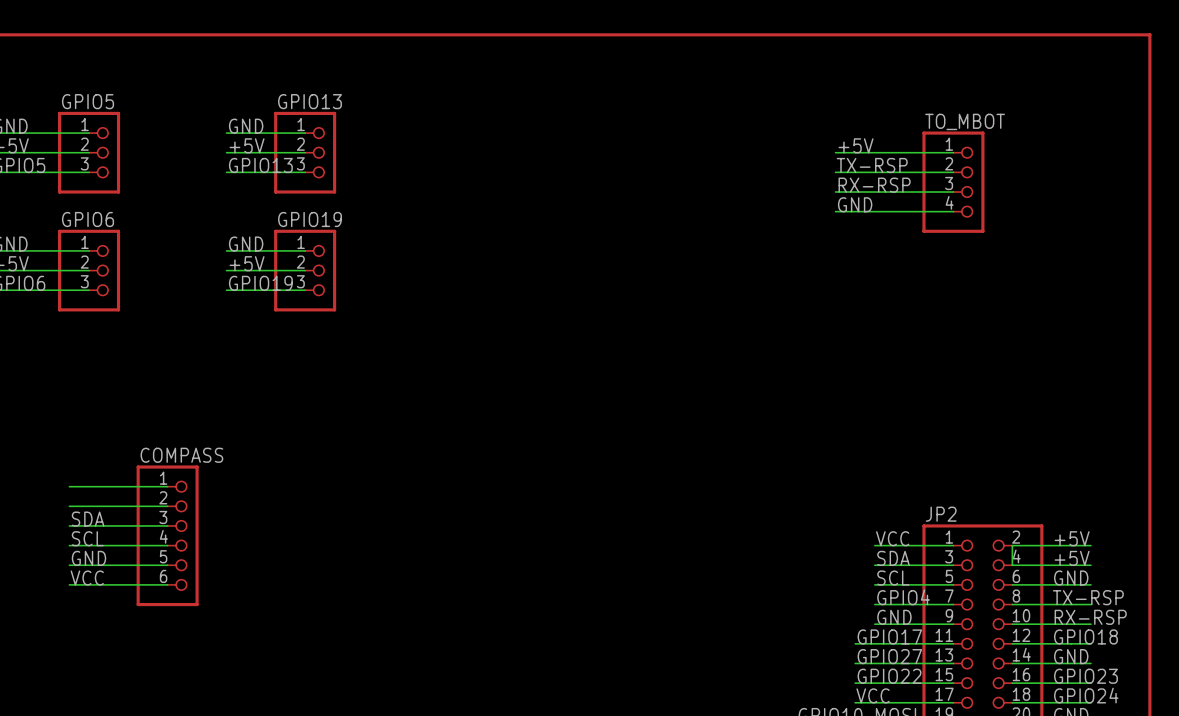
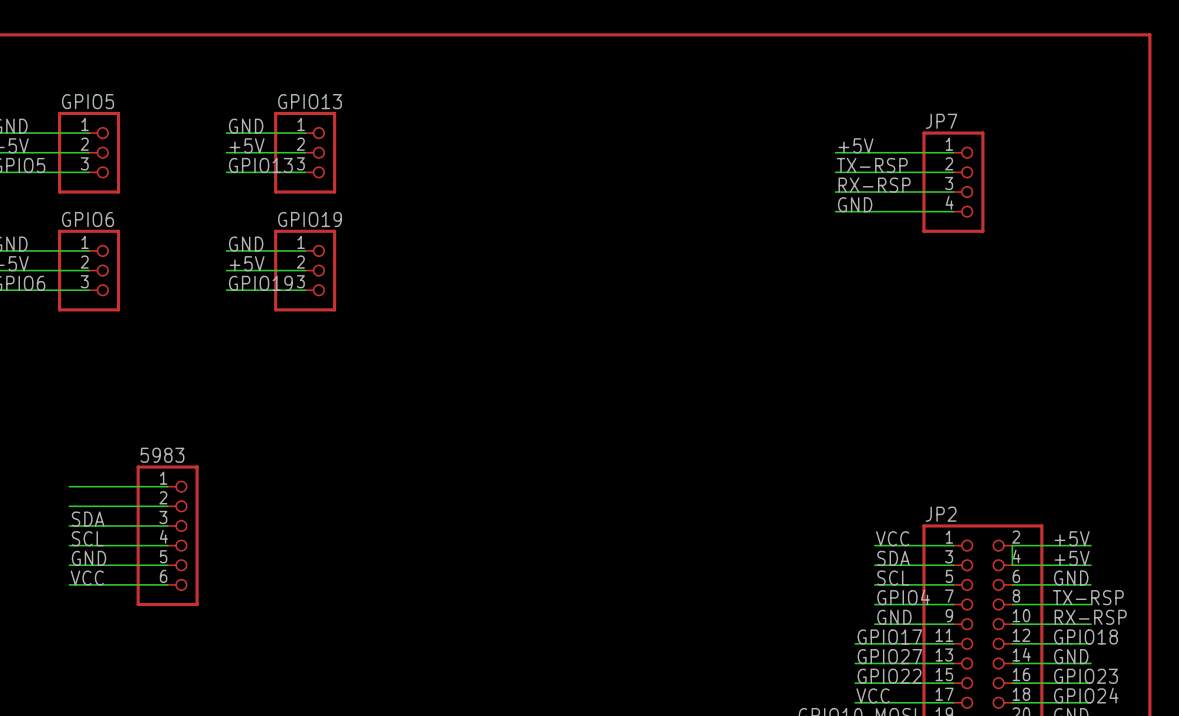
TO_MBOT name: TO_MBOT (965, 121) -> JP7 (941, 121)
COMPASS name: COMPASS (181, 455) -> 5983 (162, 455)

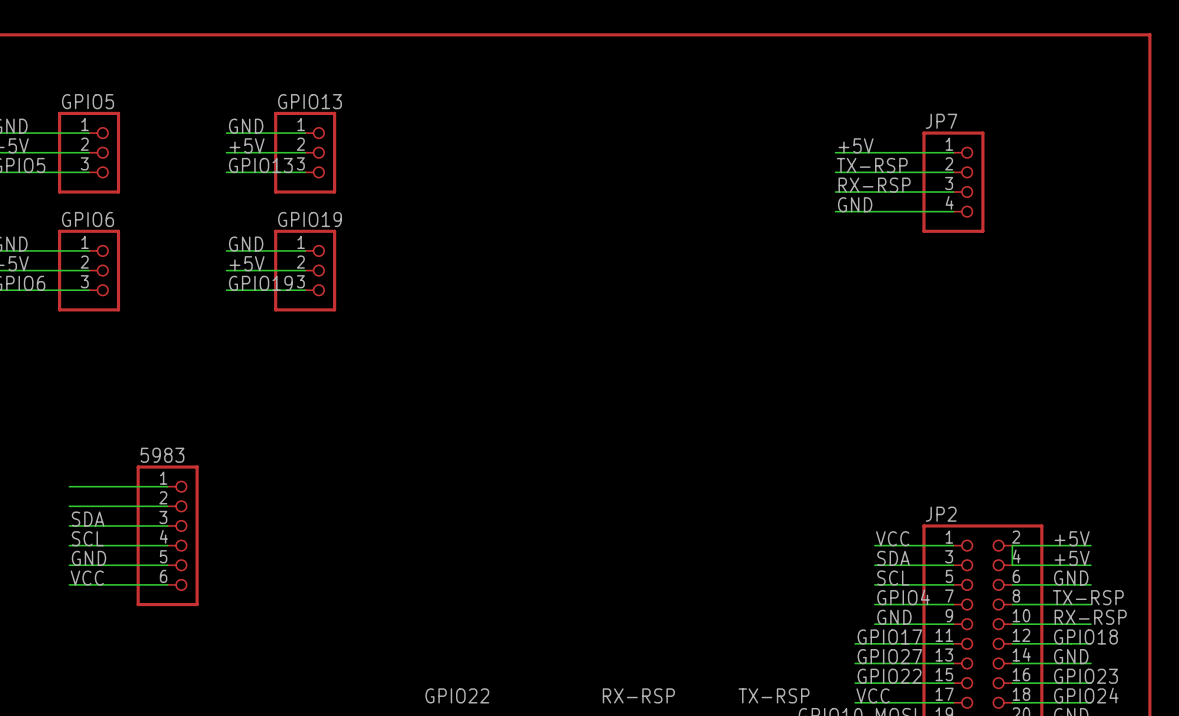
label: none -> GPIO22 (457, 695)
label: none -> RX-RSP (638, 695)
label: none -> TX-RSP (774, 695)

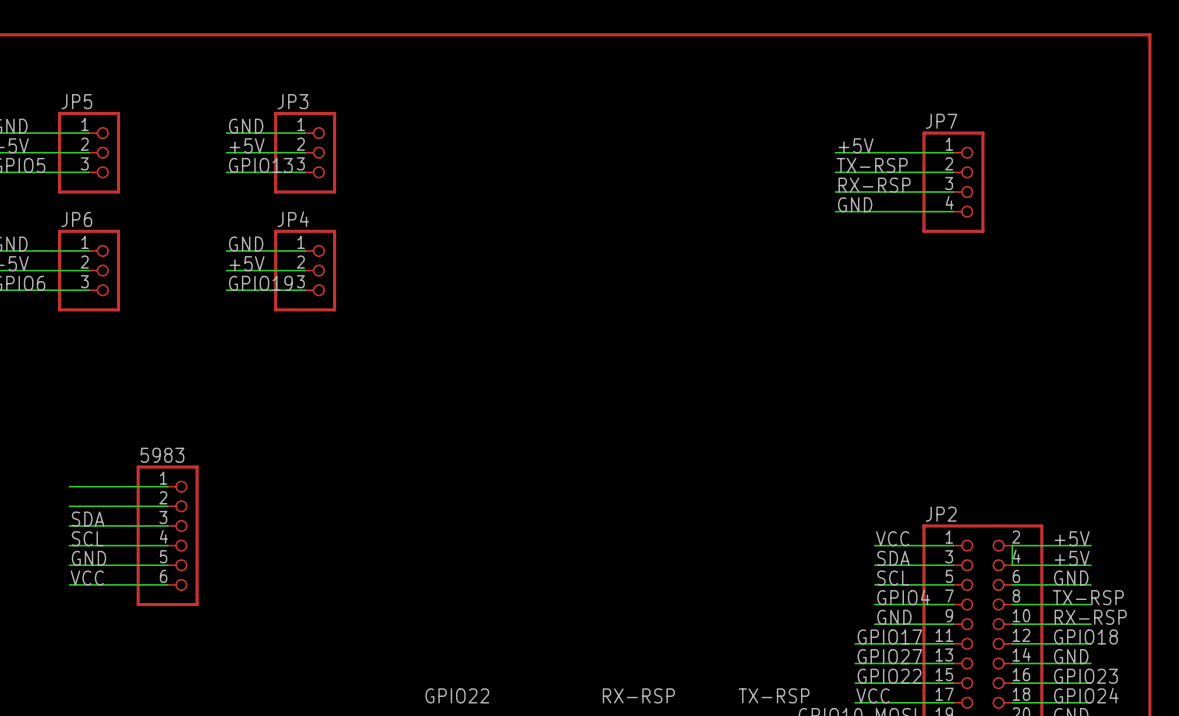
GPIO5 name: GPIO5 (88, 101) -> JP5 (76, 101)
GPIO13 name: GPIO13 (310, 101) -> JP3 (292, 101)
GPIO6 name: GPIO6 (88, 219) -> JP6 (76, 219)
GPIO19 name: GPIO19 (310, 219) -> JP4 (293, 219)

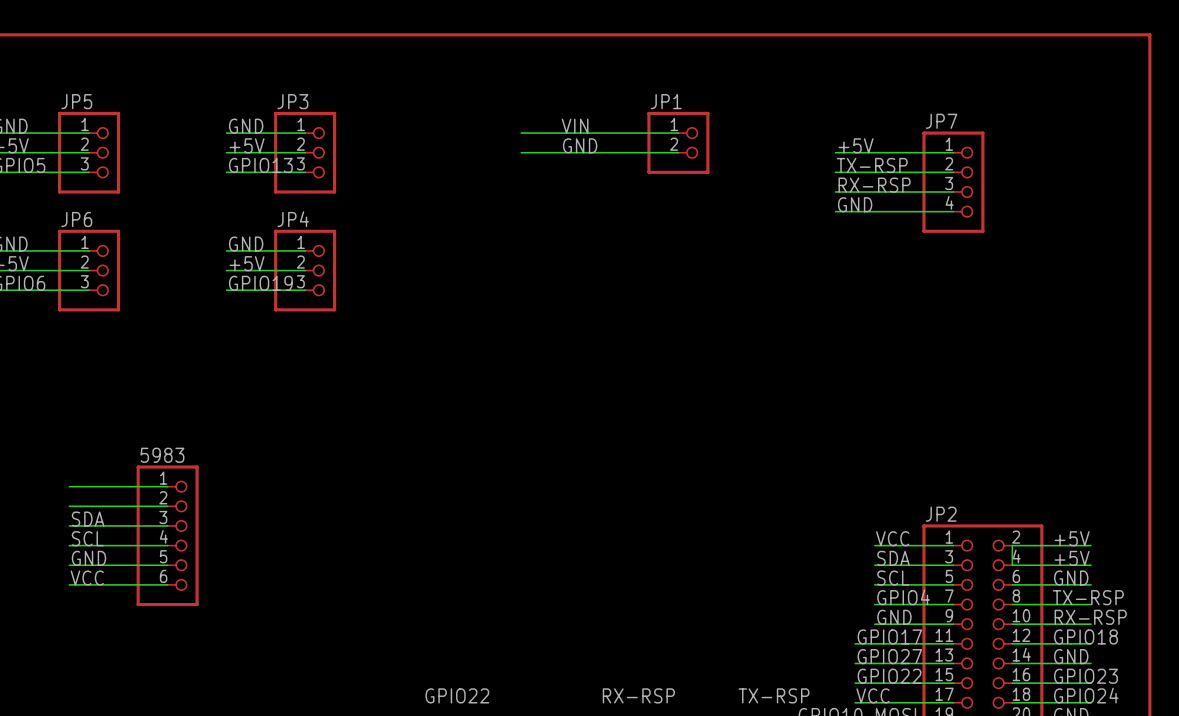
label: none -> VIN (575, 126)
wire: none -> (521, 133) (678, 133)
JP1: none -> (678, 142)
label: none -> GND (580, 145)
wire: none -> (521, 152) (678, 152)

